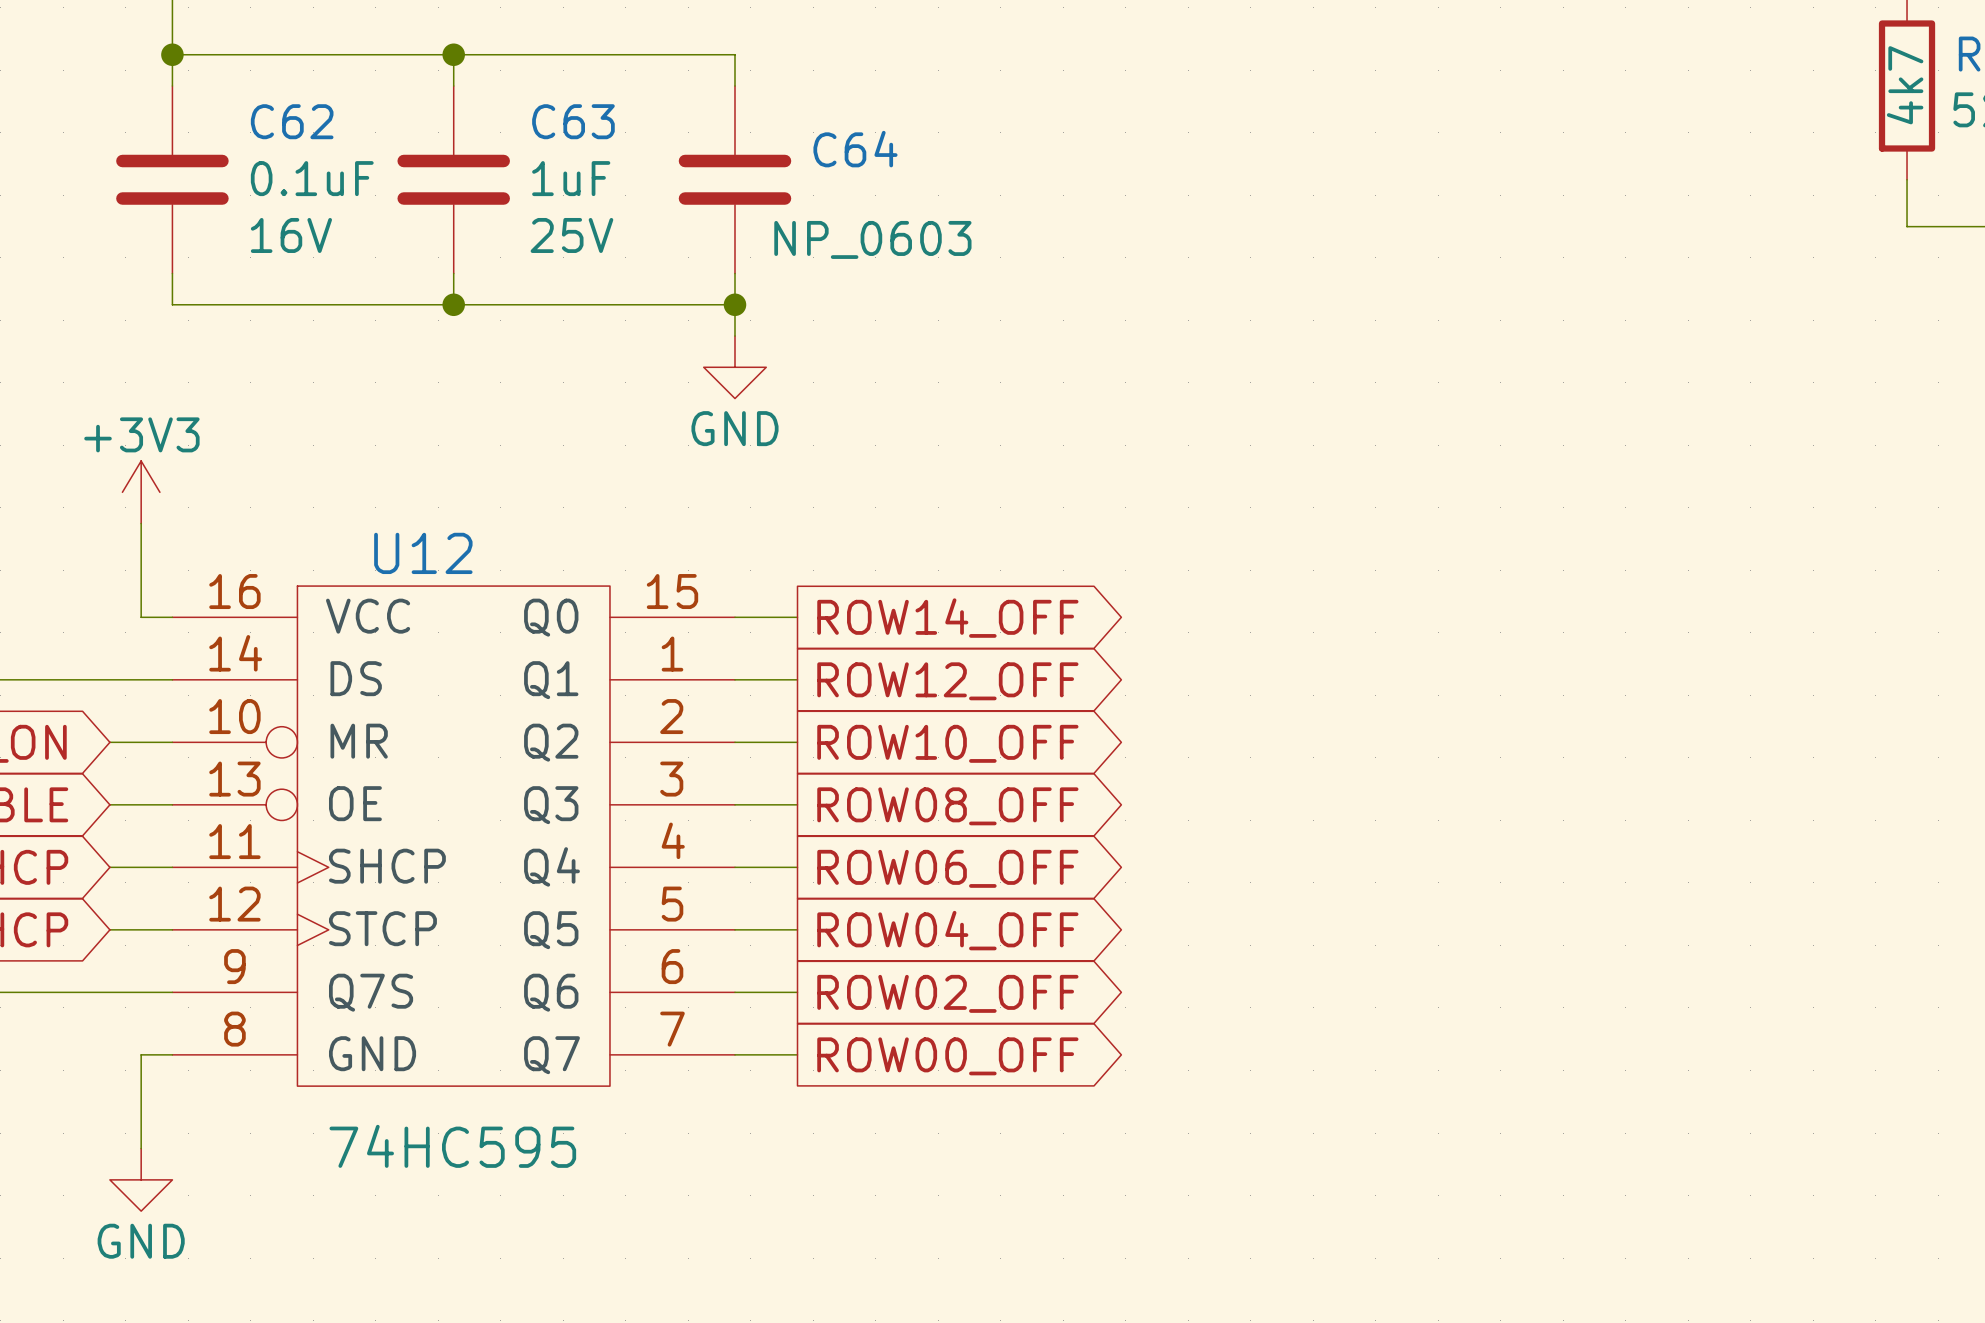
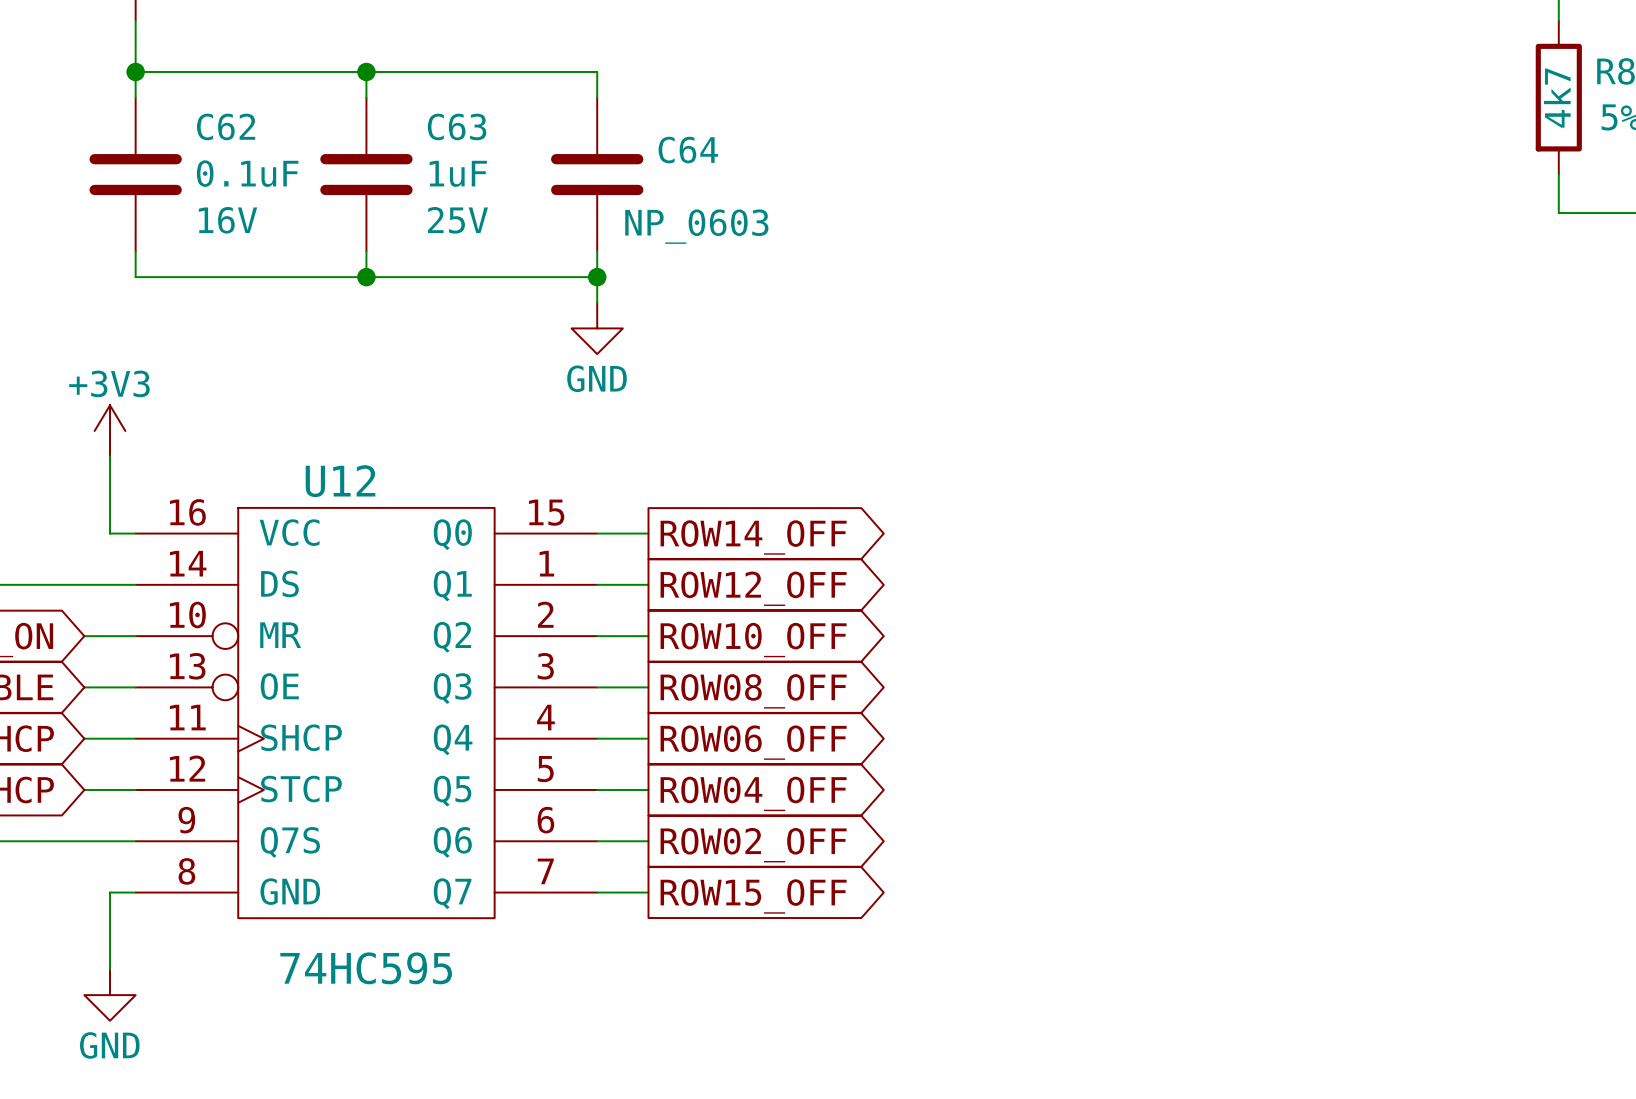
global label: ROW00_OFF (947, 1056) -> ROW15_OFF (753, 896)

